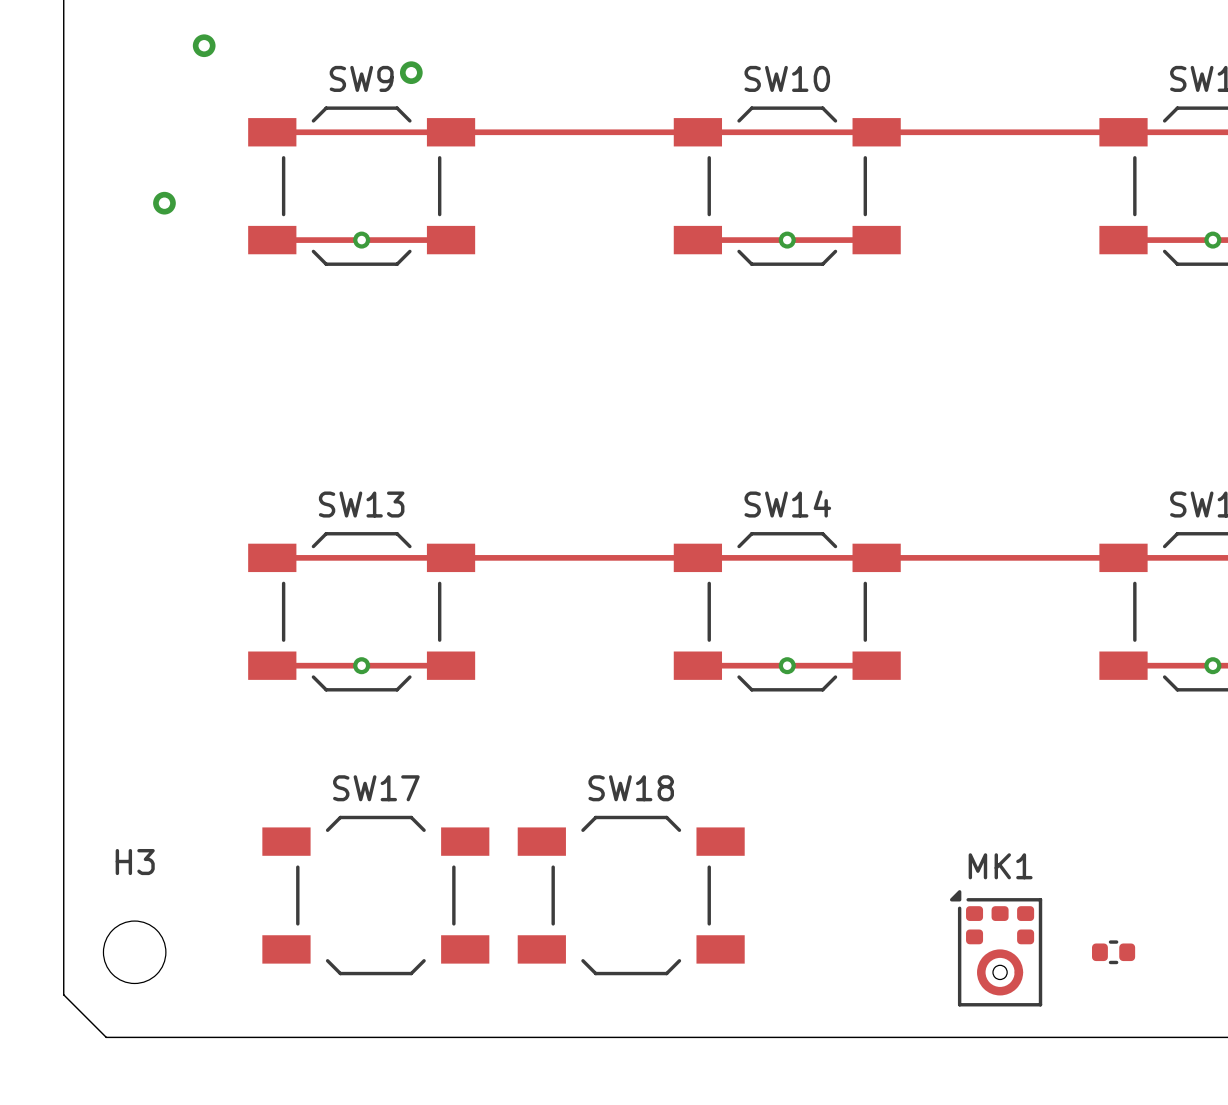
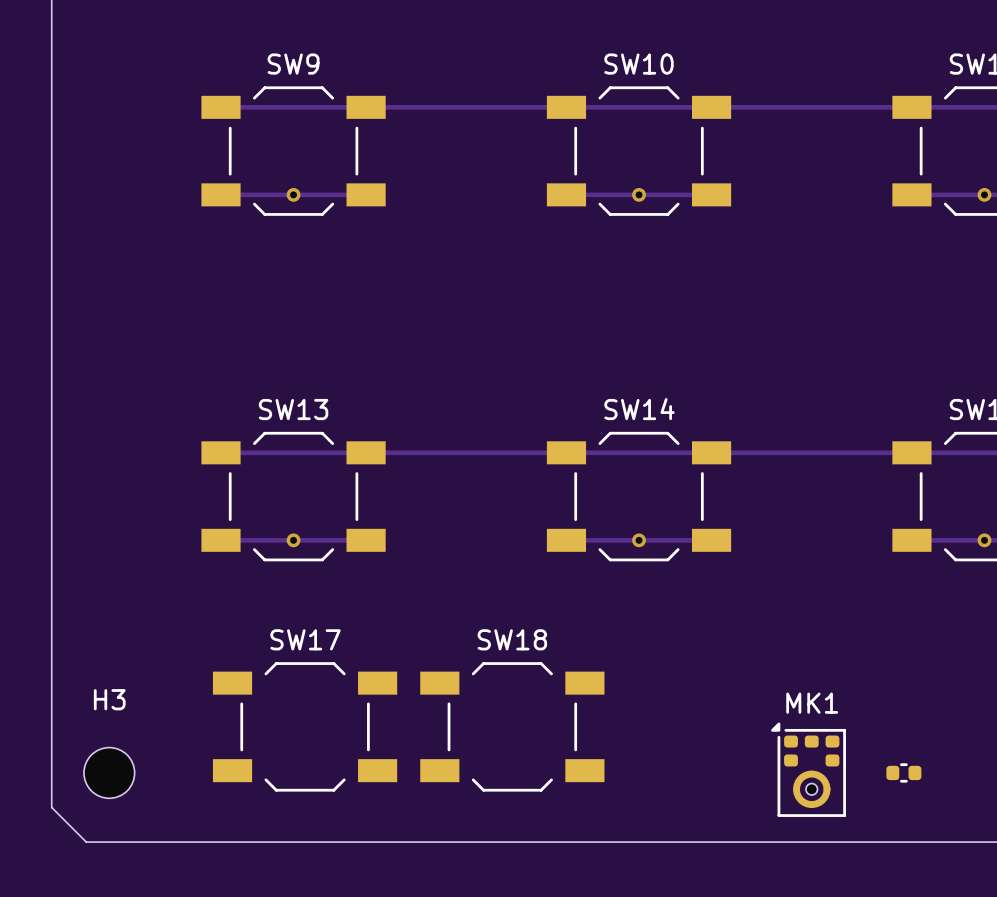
via: (204, 45) -> none
via: (411, 72) -> none
via: (164, 203) -> none

